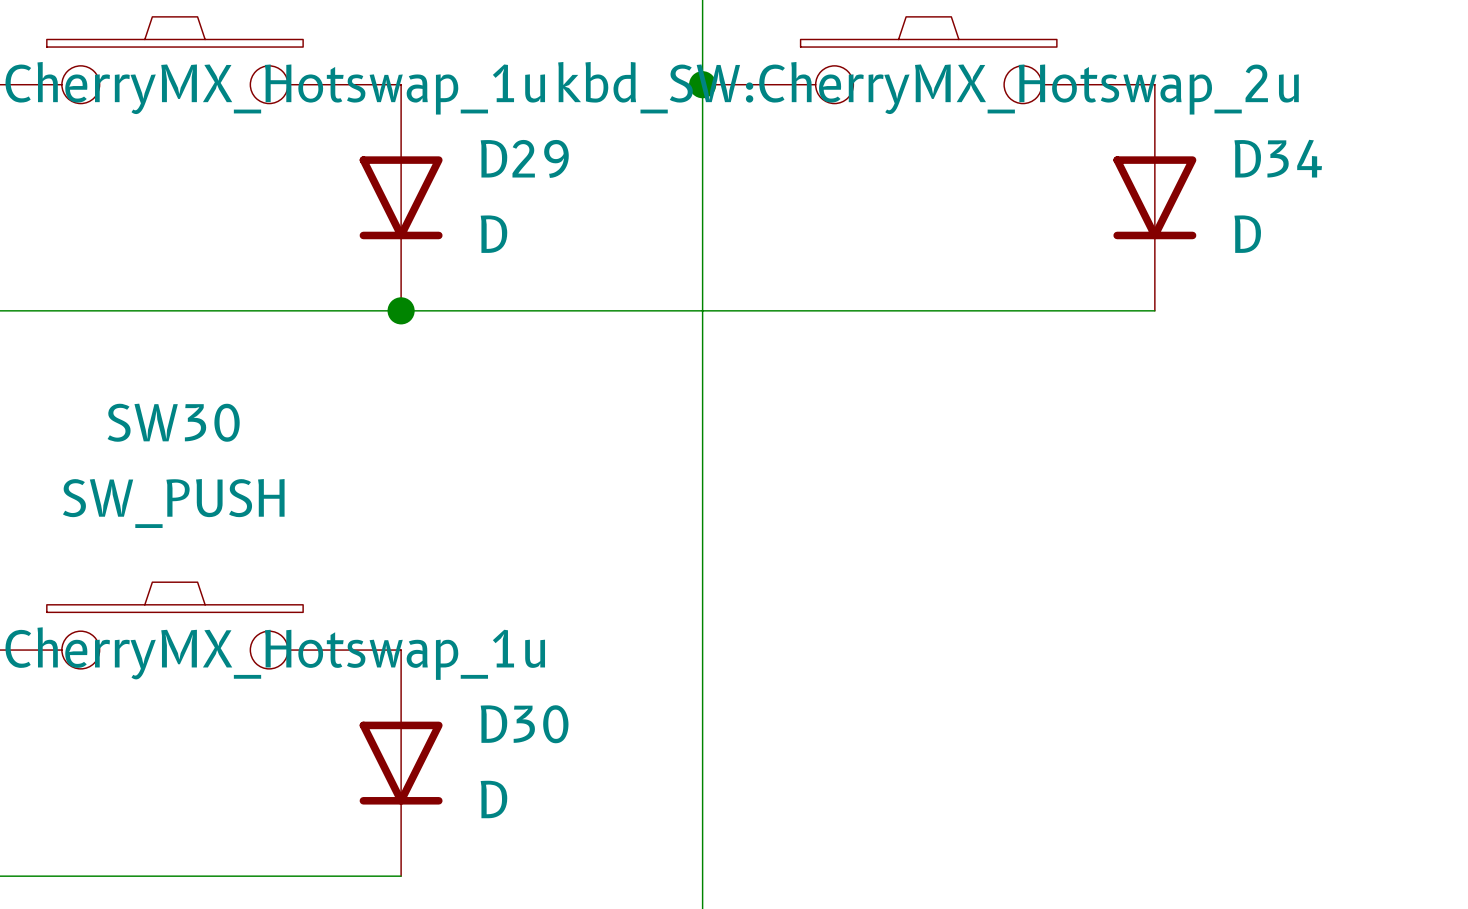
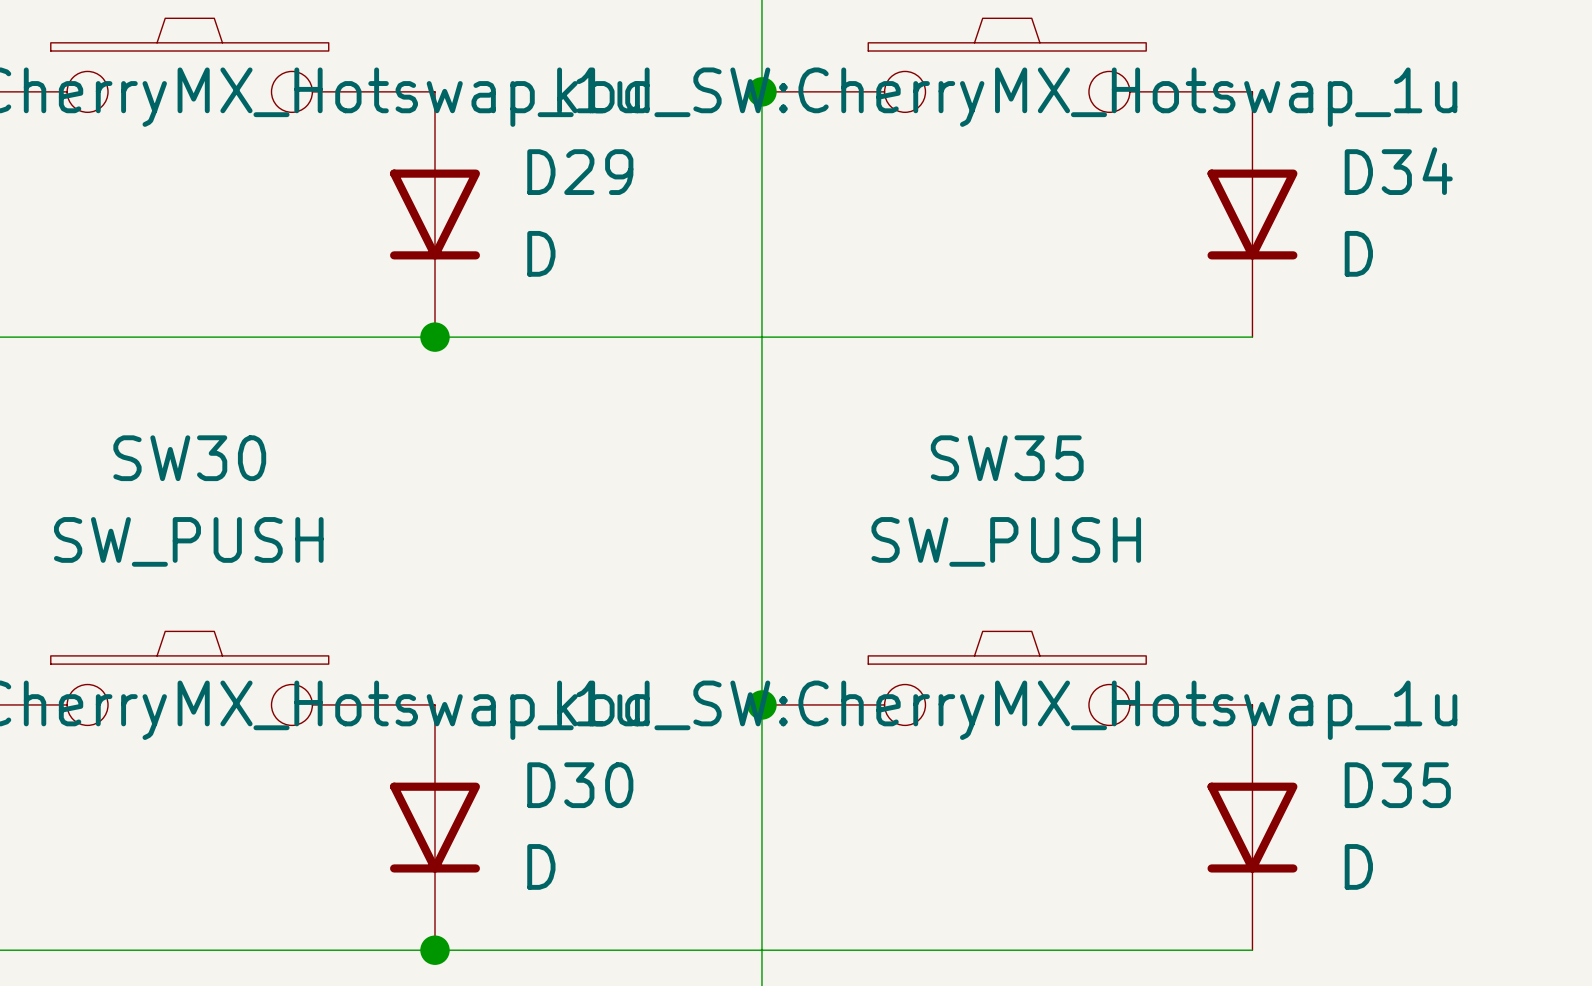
part text: kbd_SW:CherryMX_Hotswap_2u (928, 88) -> kbd_SW:CherryMX_Hotswap_1u (1007, 97)
SW35: none -> SW_PUSH (1007, 678)
junction: none -> (761, 704)
D35: none -> D (1252, 827)
wire: none -> (435, 950) (1252, 950)
junction: none -> (435, 950)

